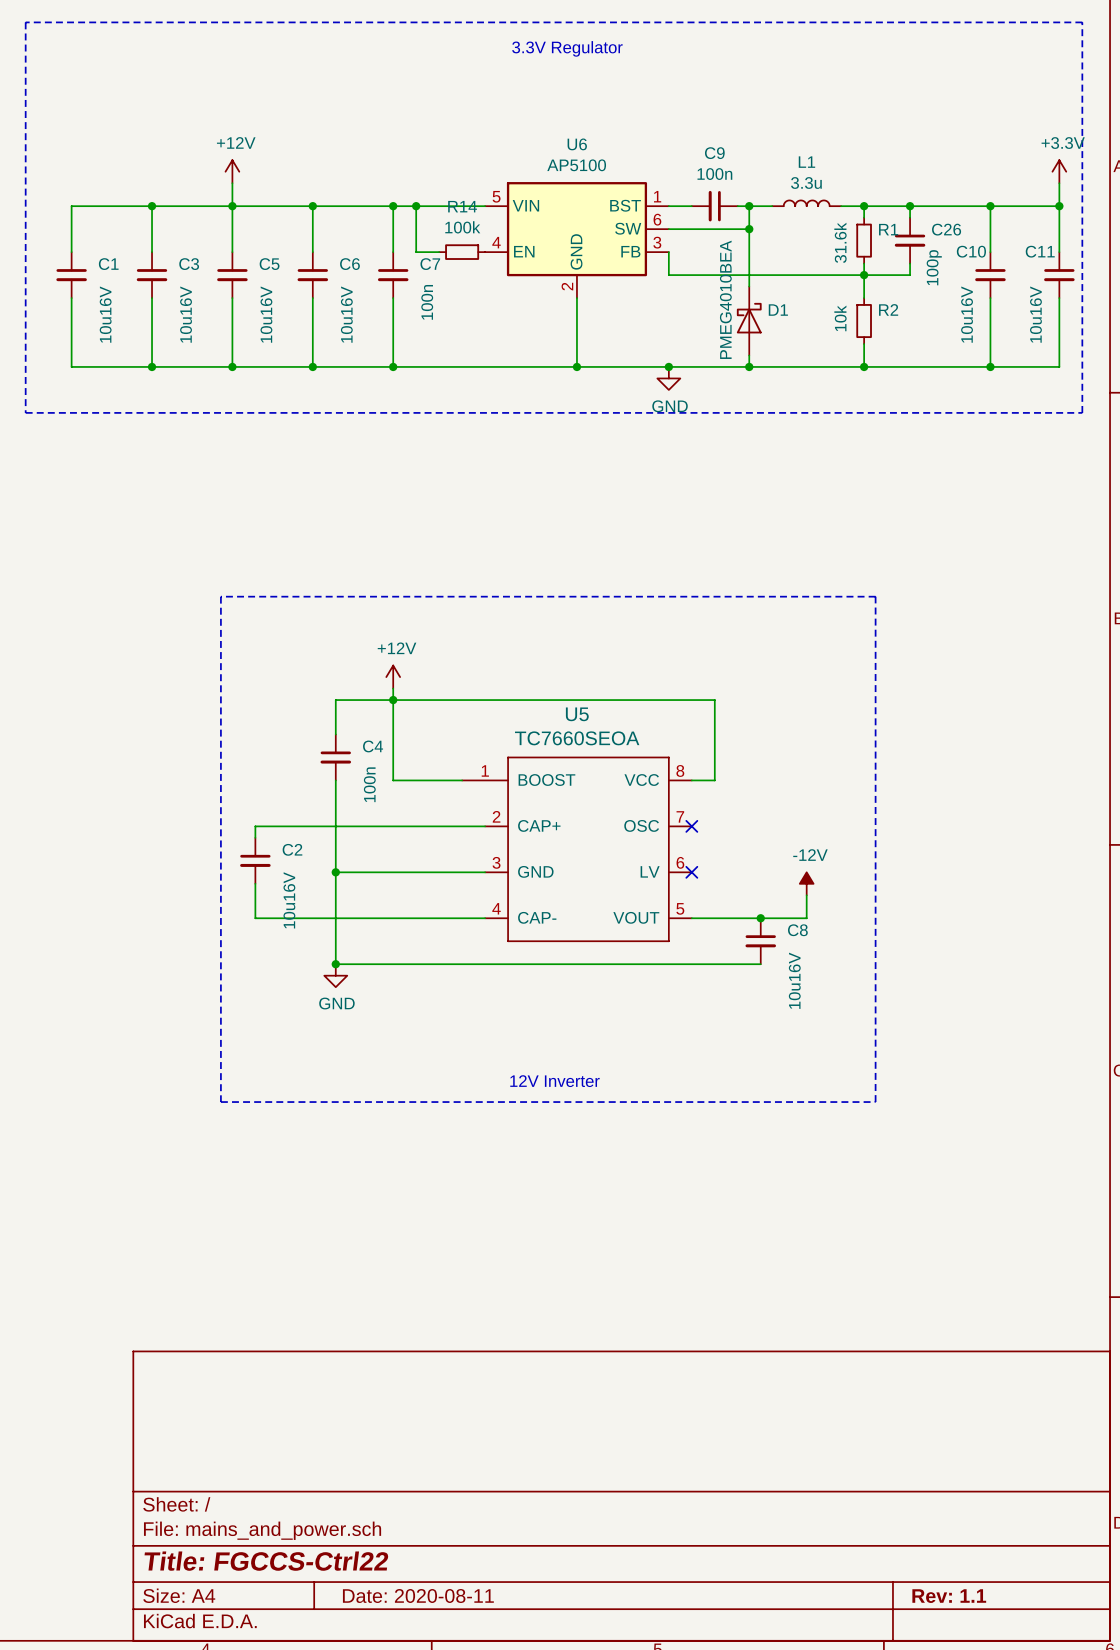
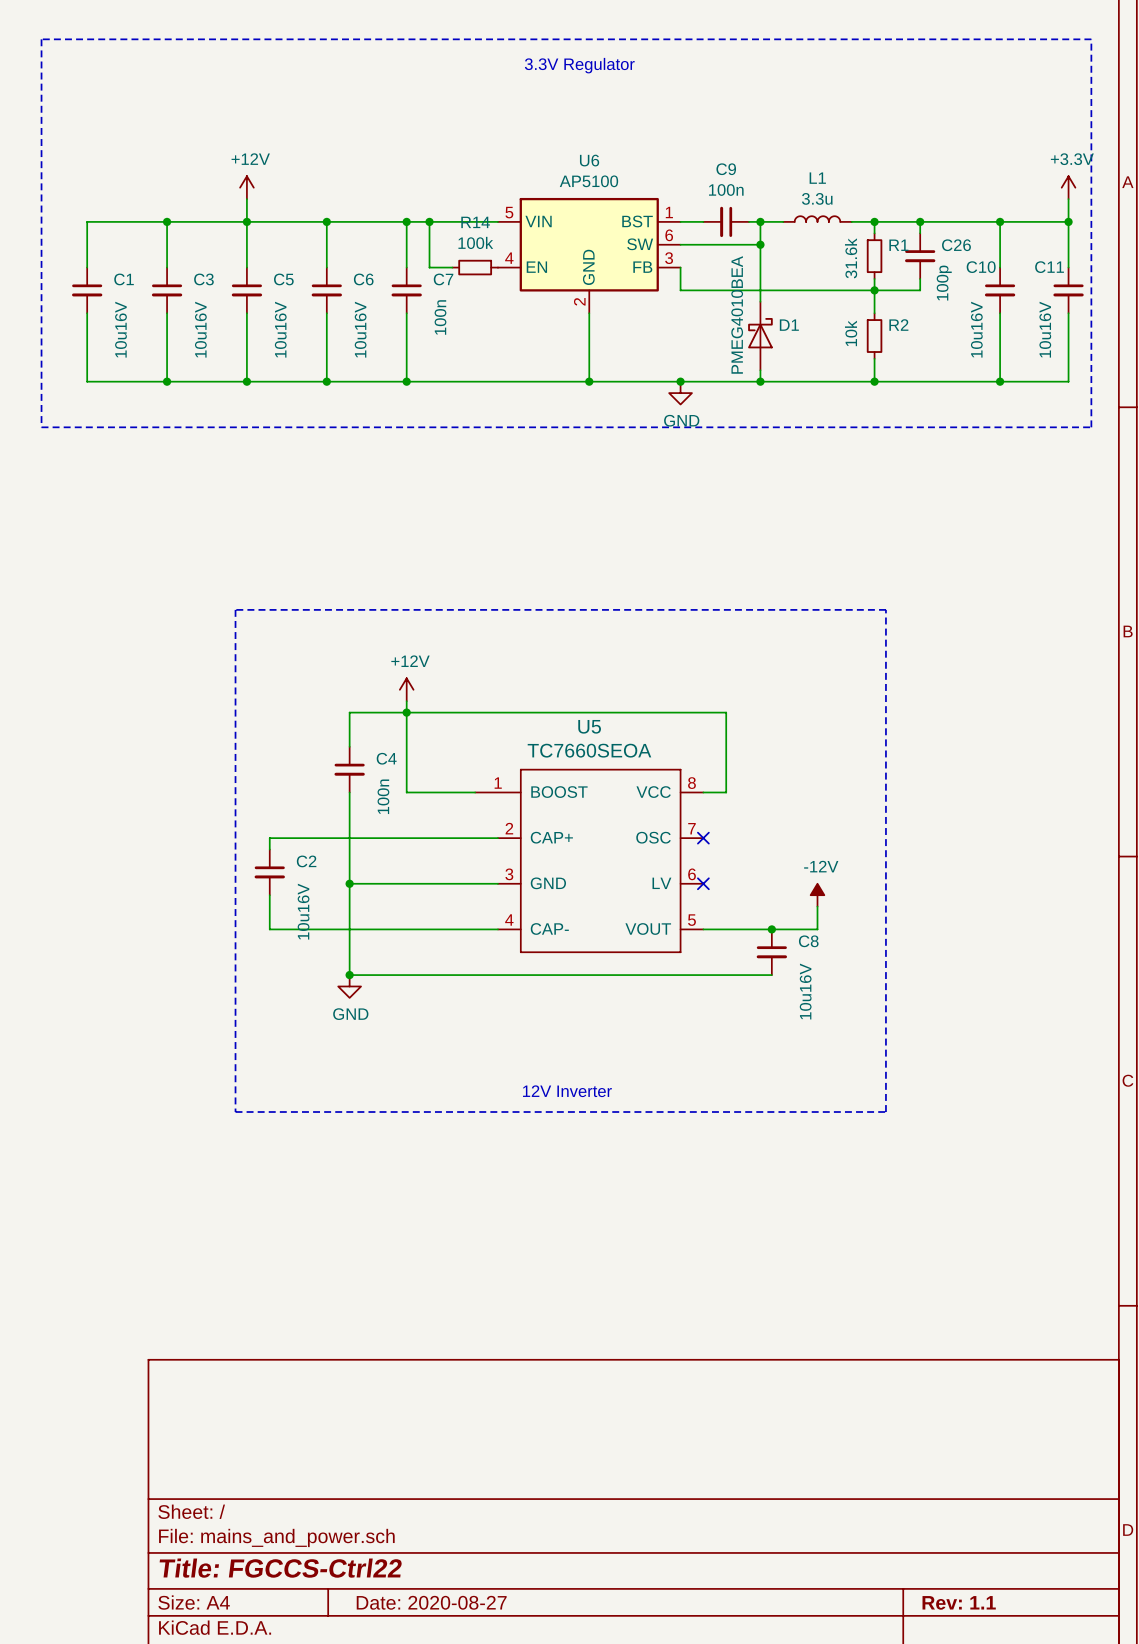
title block: Date: 2020-08-11 (418, 1596) -> Date: 2020-08-27 (431, 1602)

